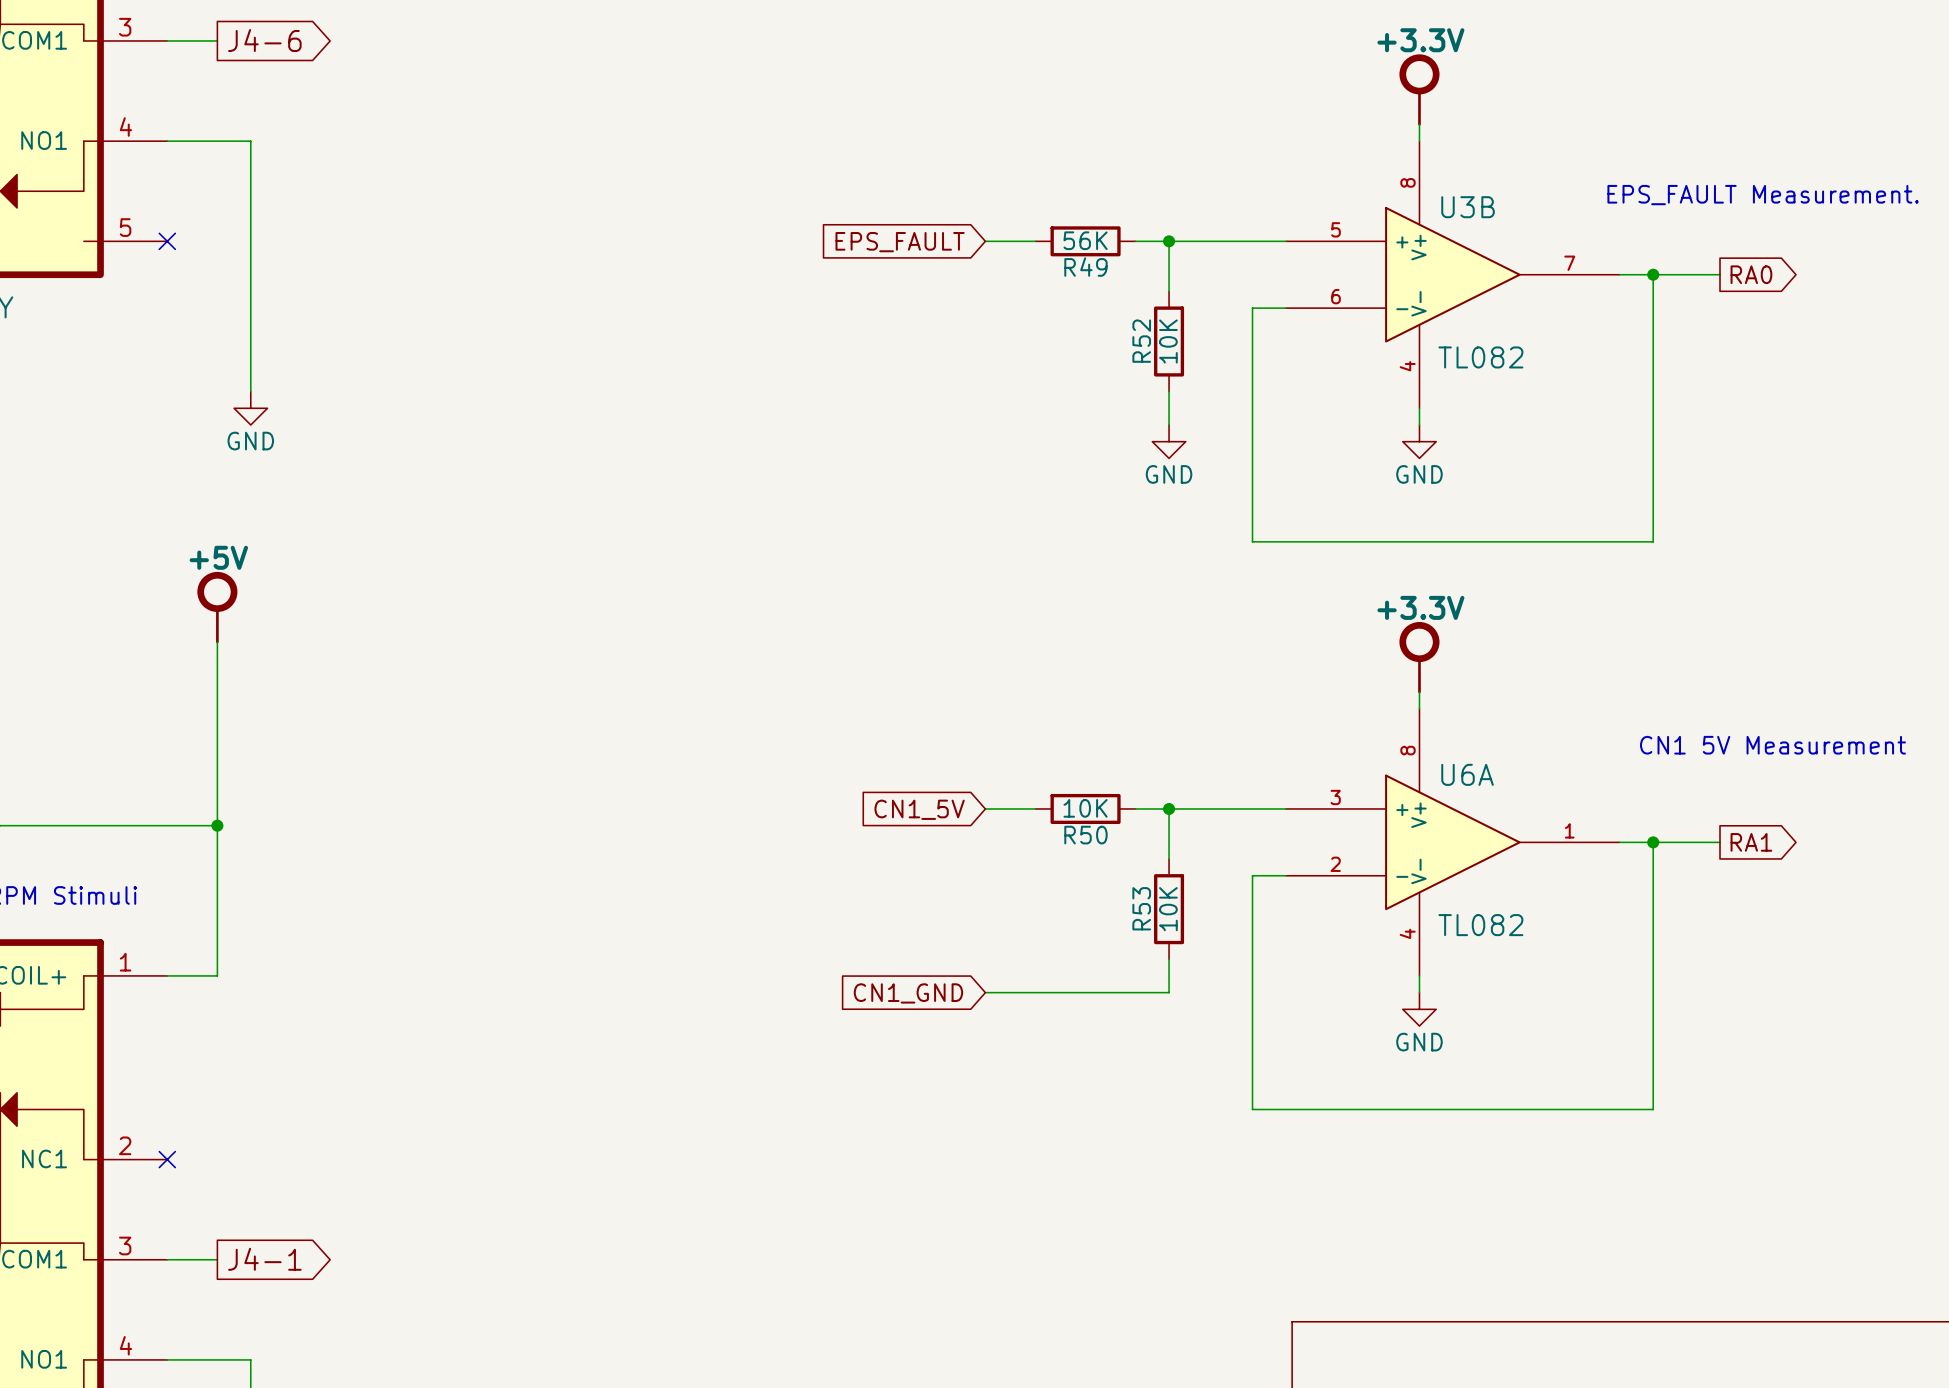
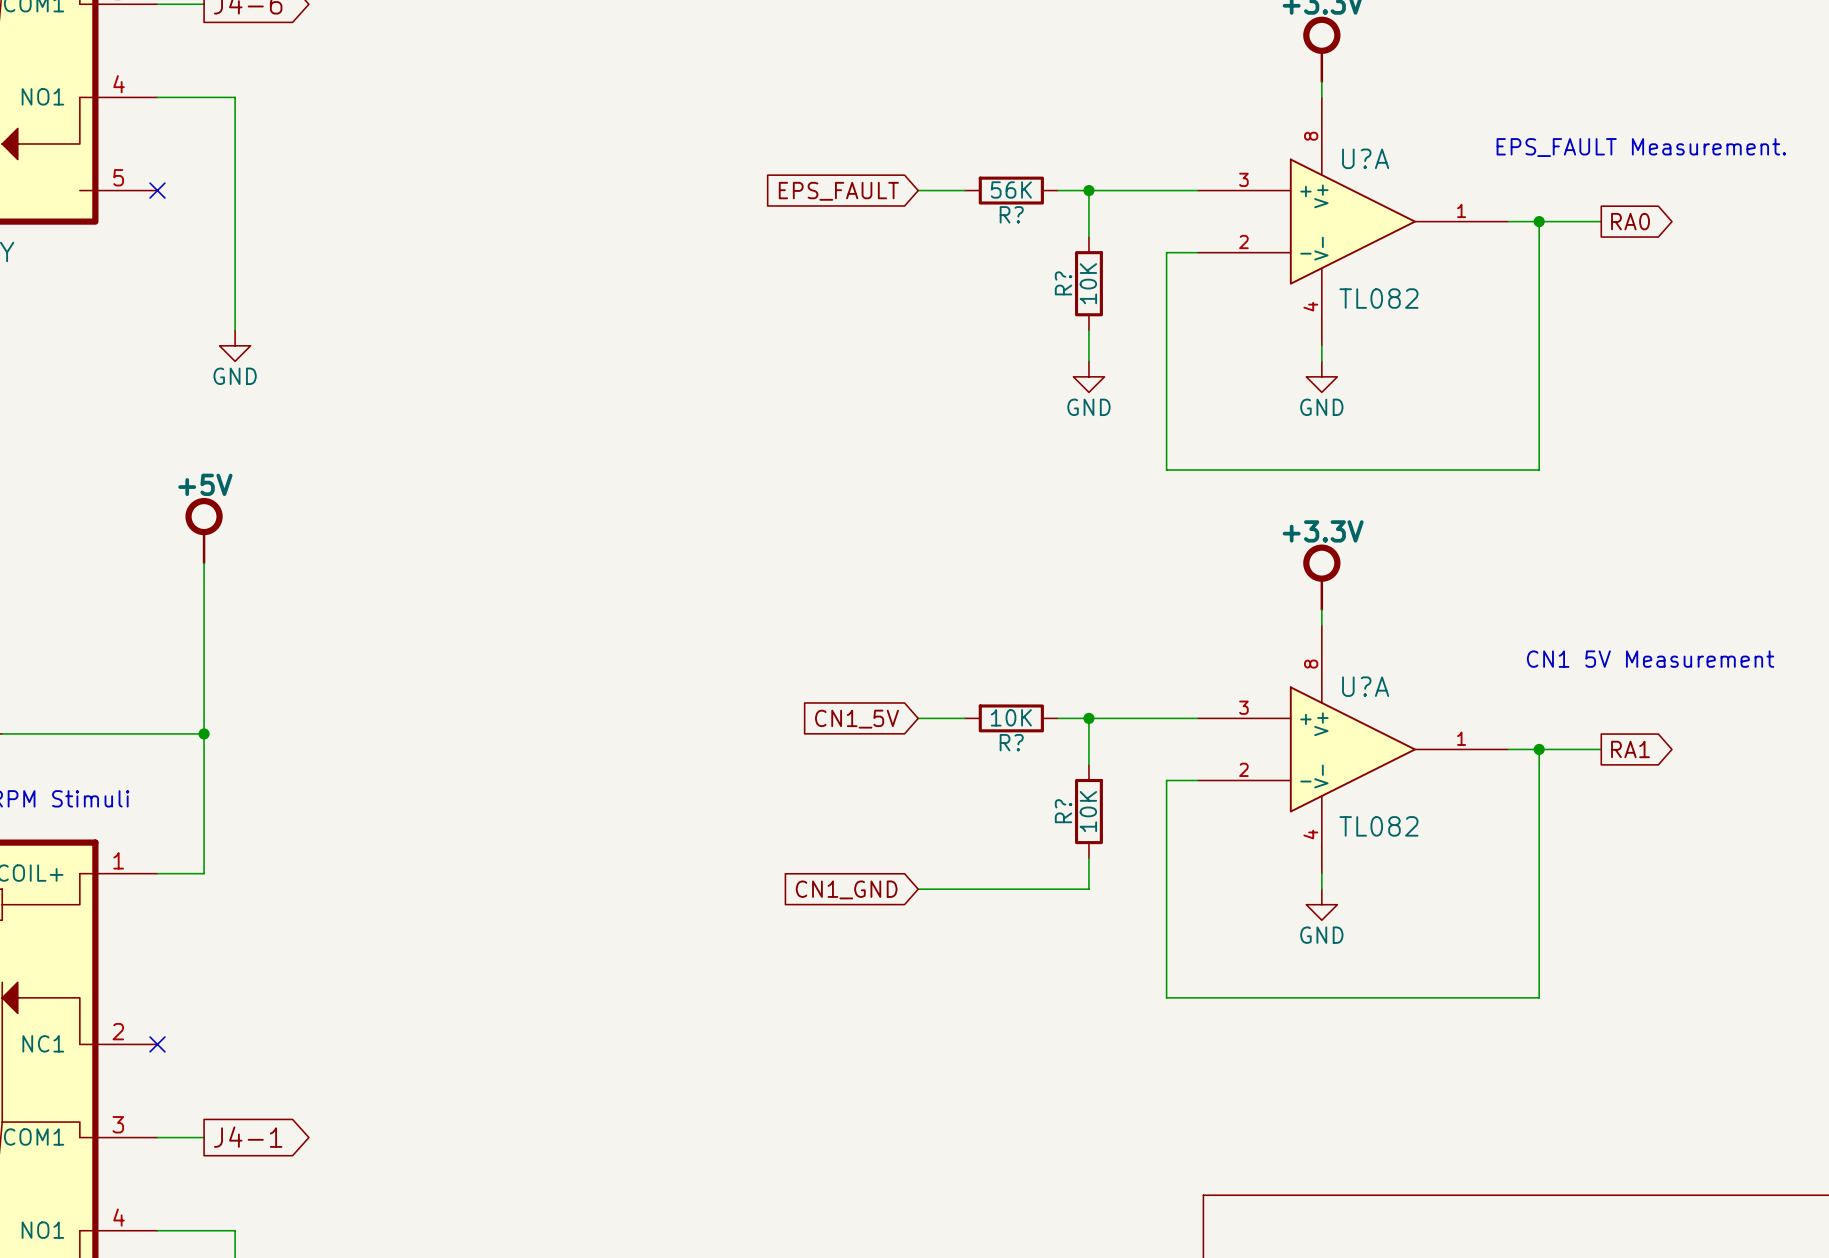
U3B name: U3B (1468, 207) -> U?A (1365, 158)
U3B pin number: 5 (1336, 229) -> 3 (1243, 179)
U3B pin number: 7 (1569, 263) -> 1 (1461, 210)
R49 name: R49 (1085, 267) -> R? (1011, 214)
U3B pin number: 6 (1336, 296) -> 2 (1243, 241)
R52 name: R52 (1141, 341) -> R? (1063, 283)
U6A name: U6A (1467, 774) -> U?A (1365, 686)
R50 name: R50 (1085, 835) -> R? (1011, 742)
R53 name: R53 (1141, 908) -> R? (1063, 811)

